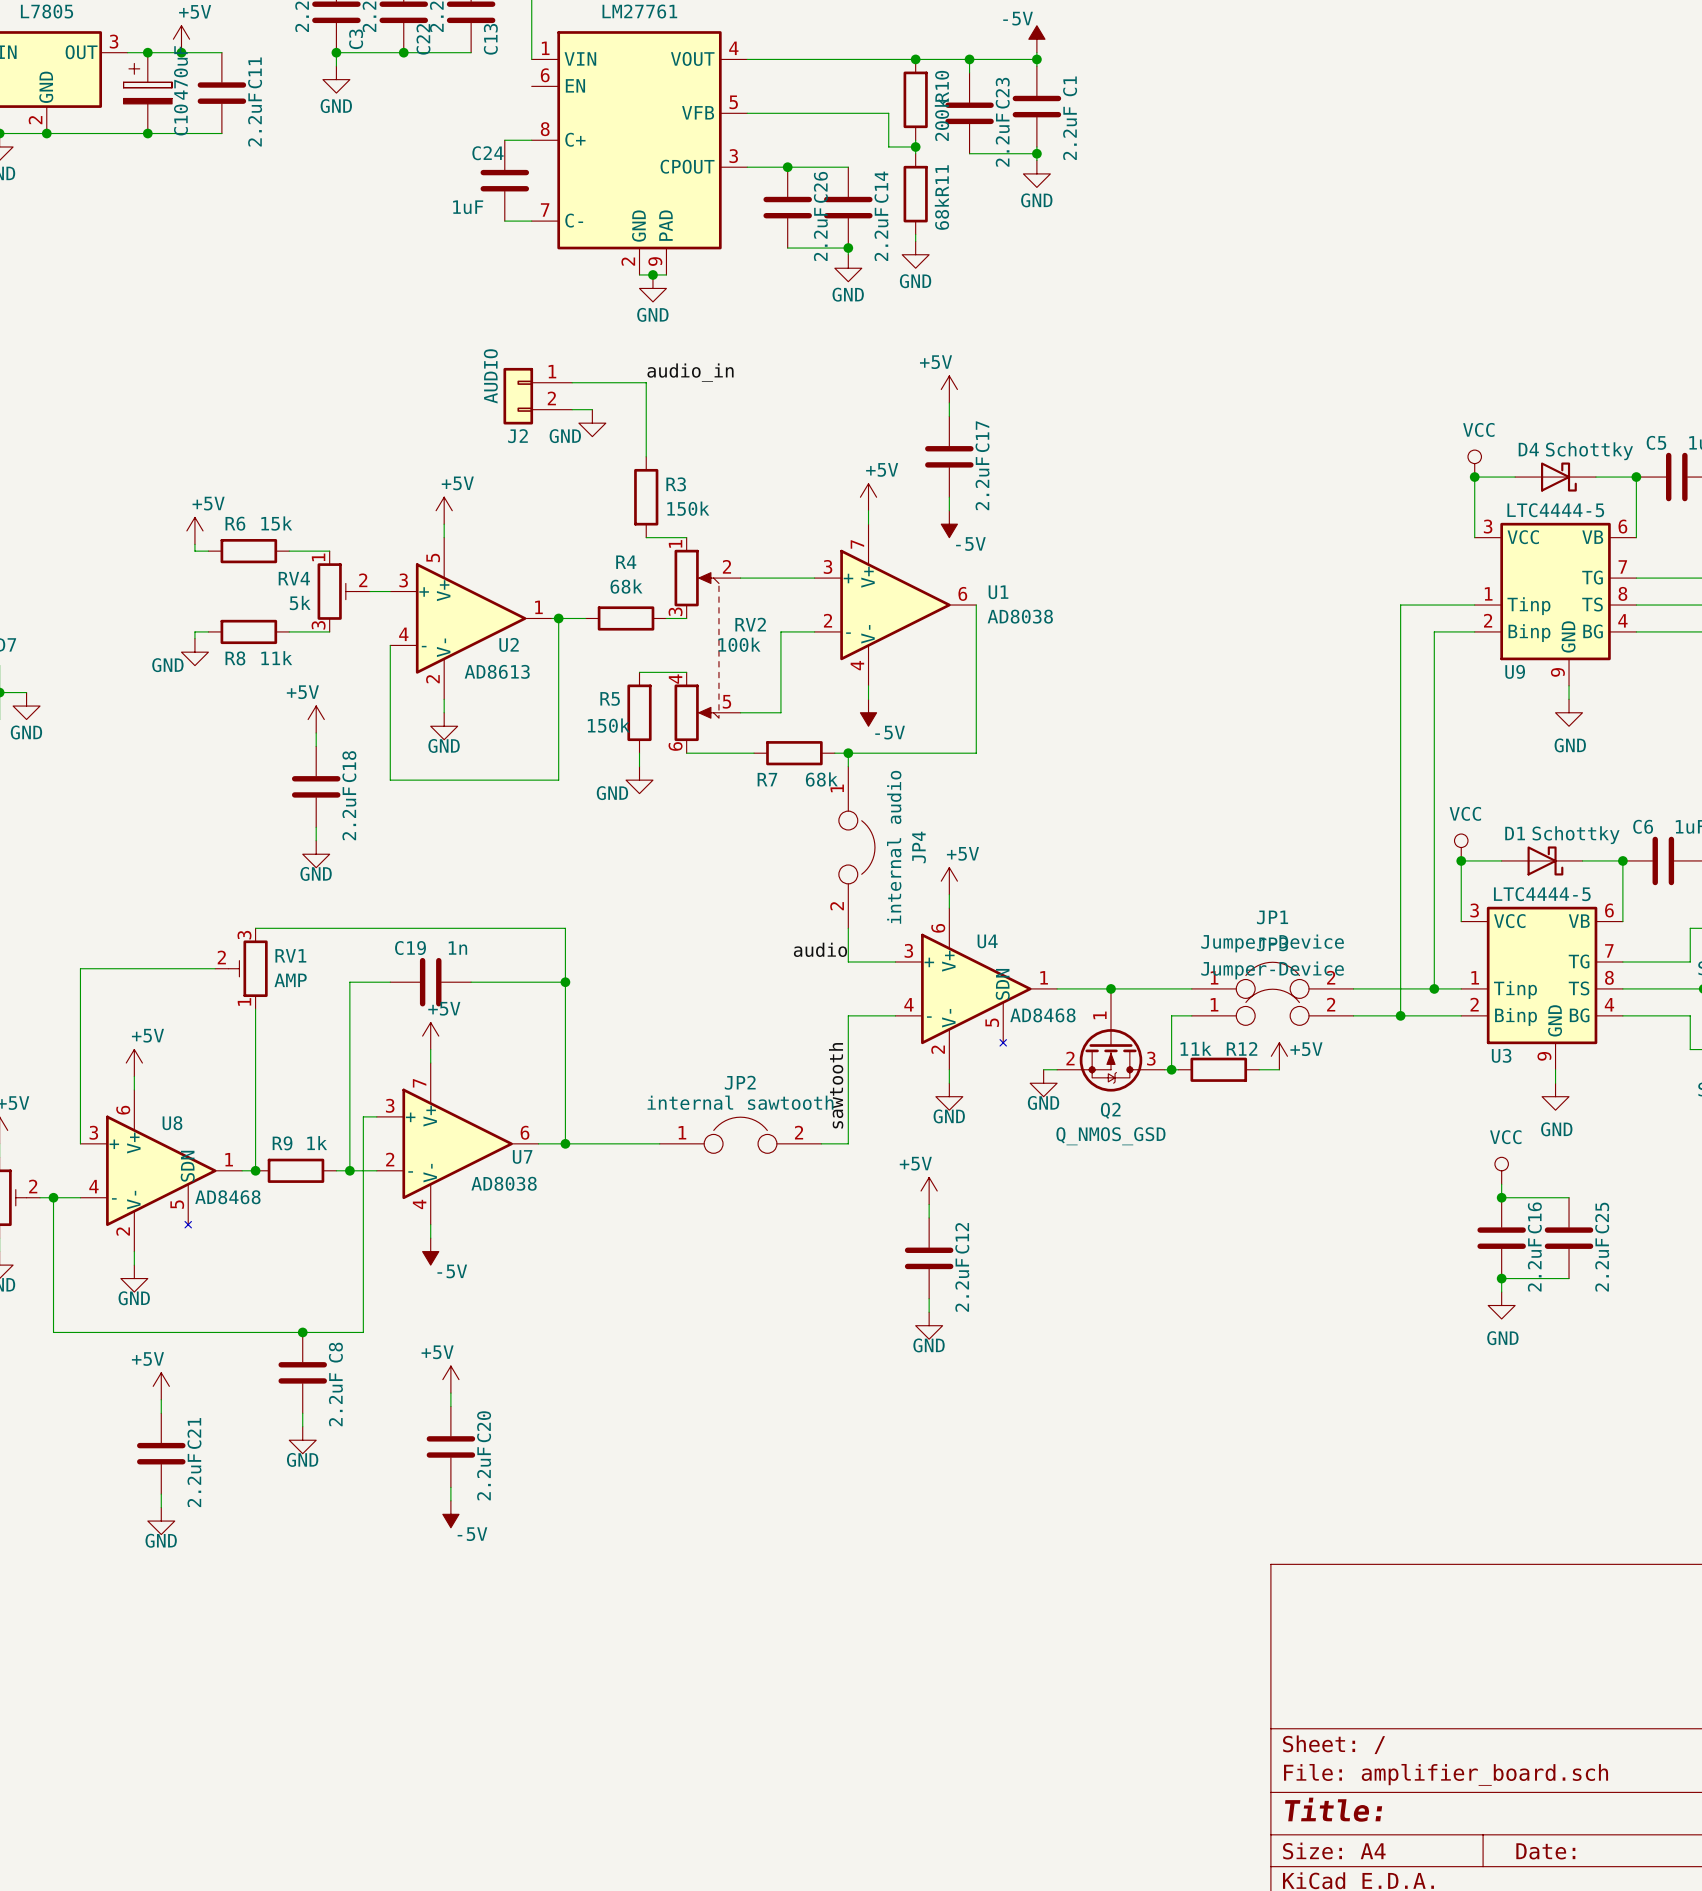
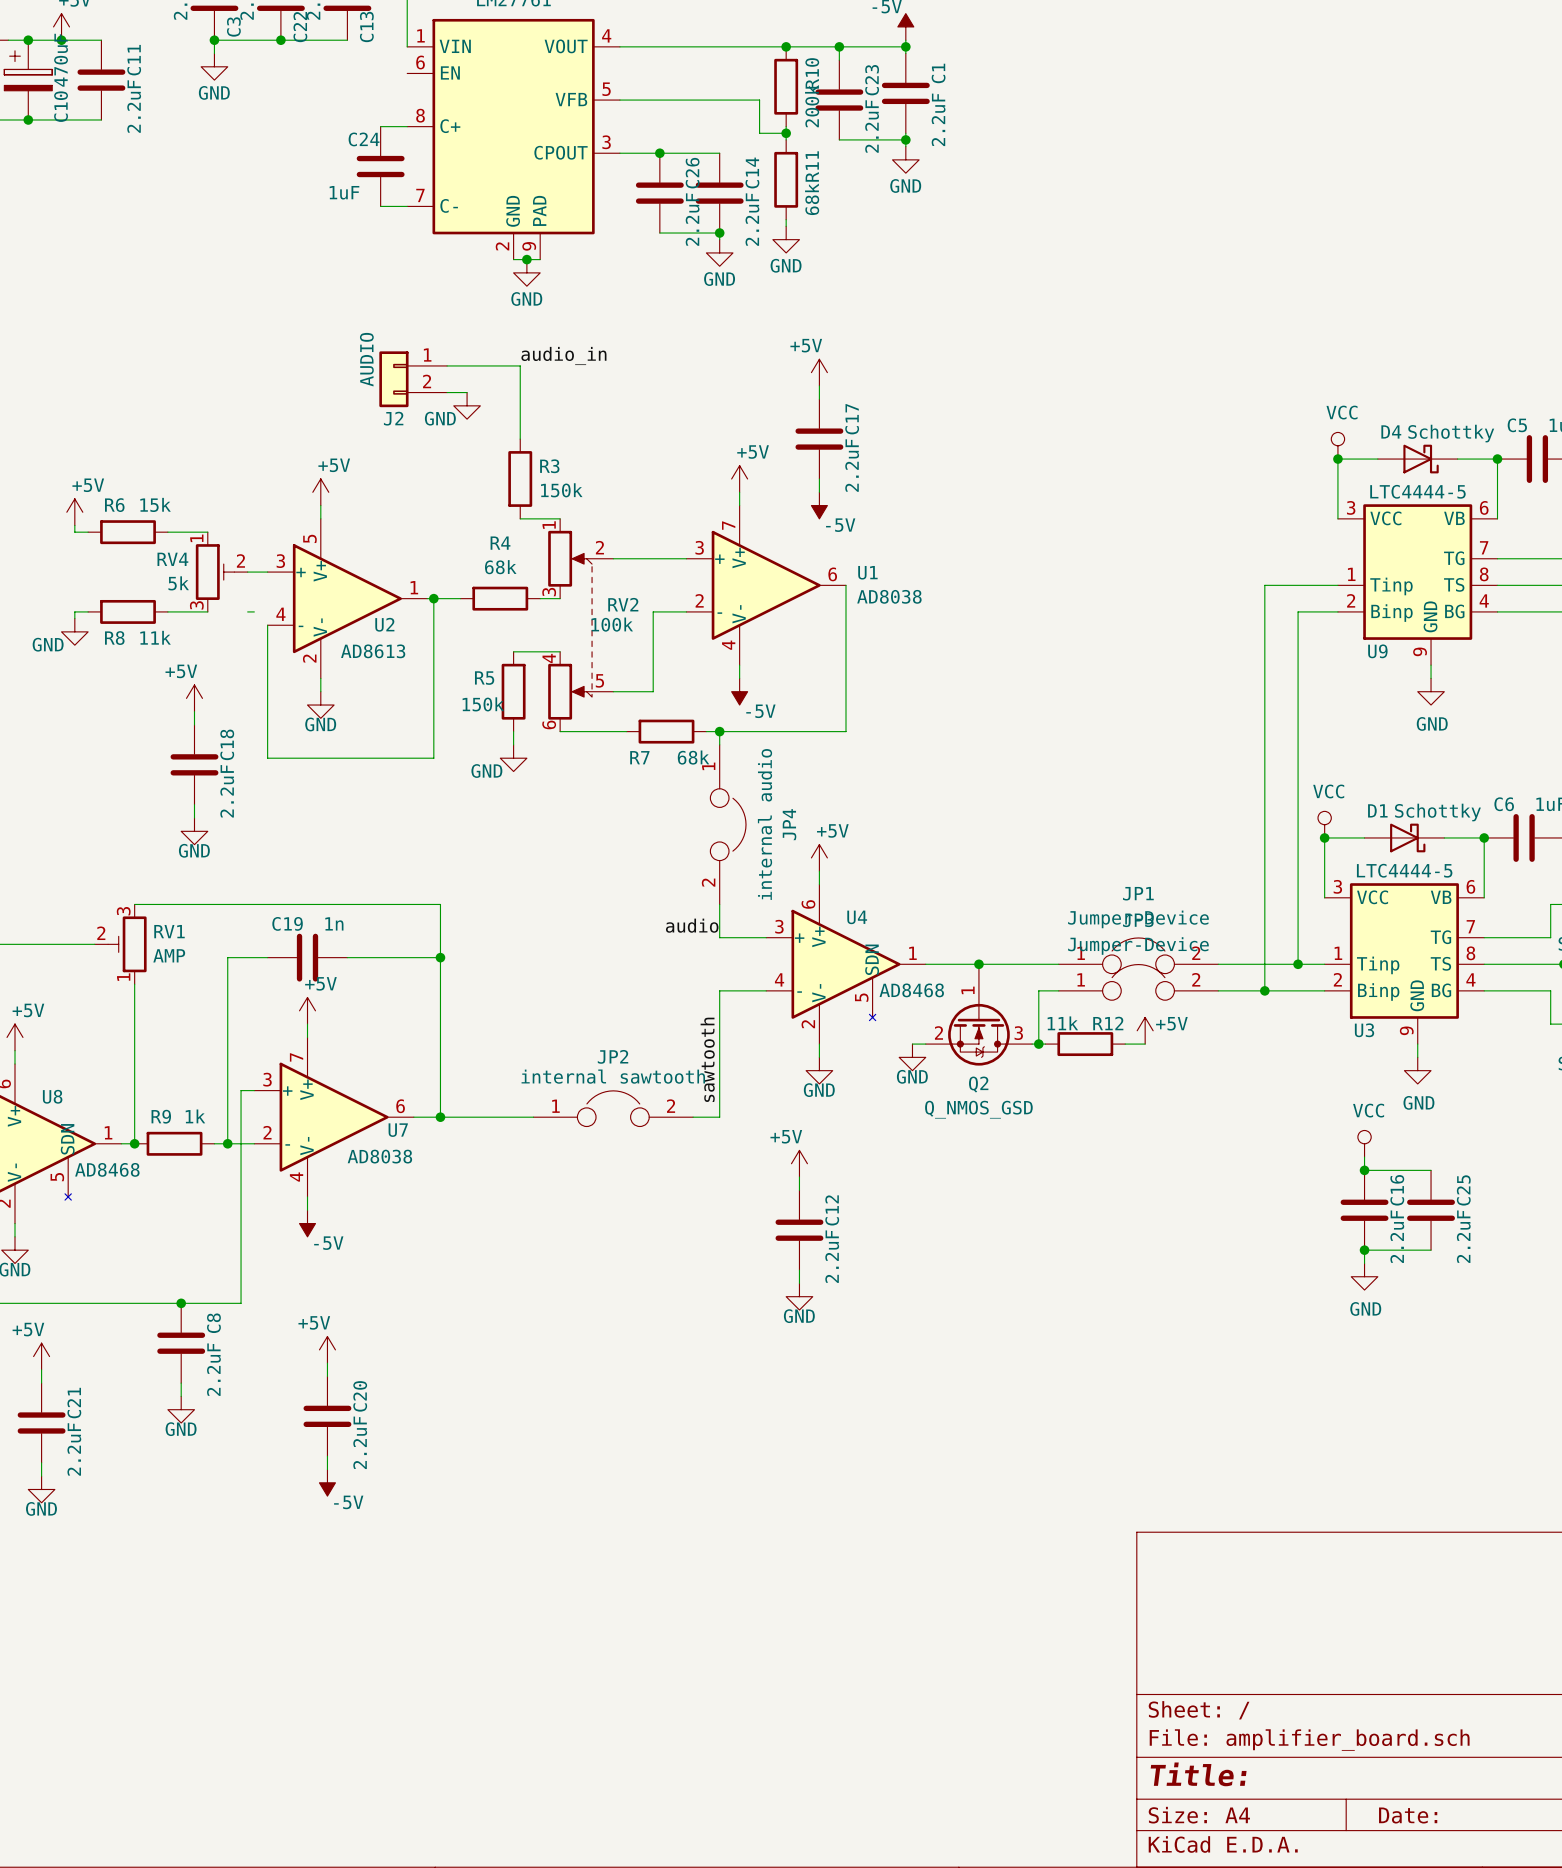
wire: none -> (247, 611) (254, 611)

